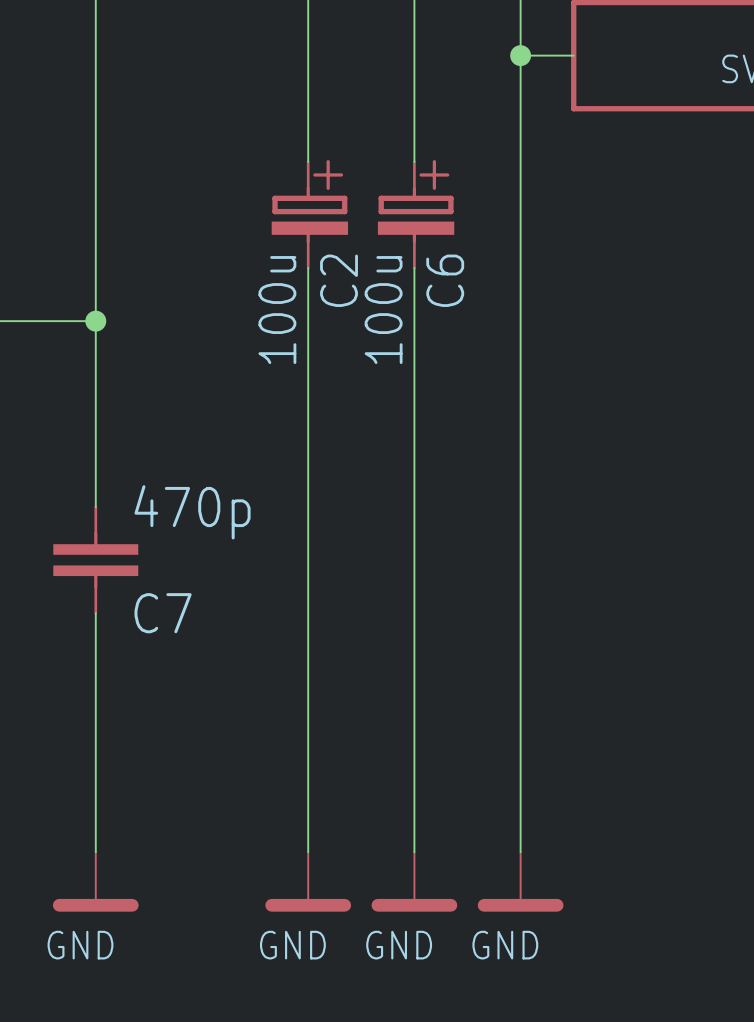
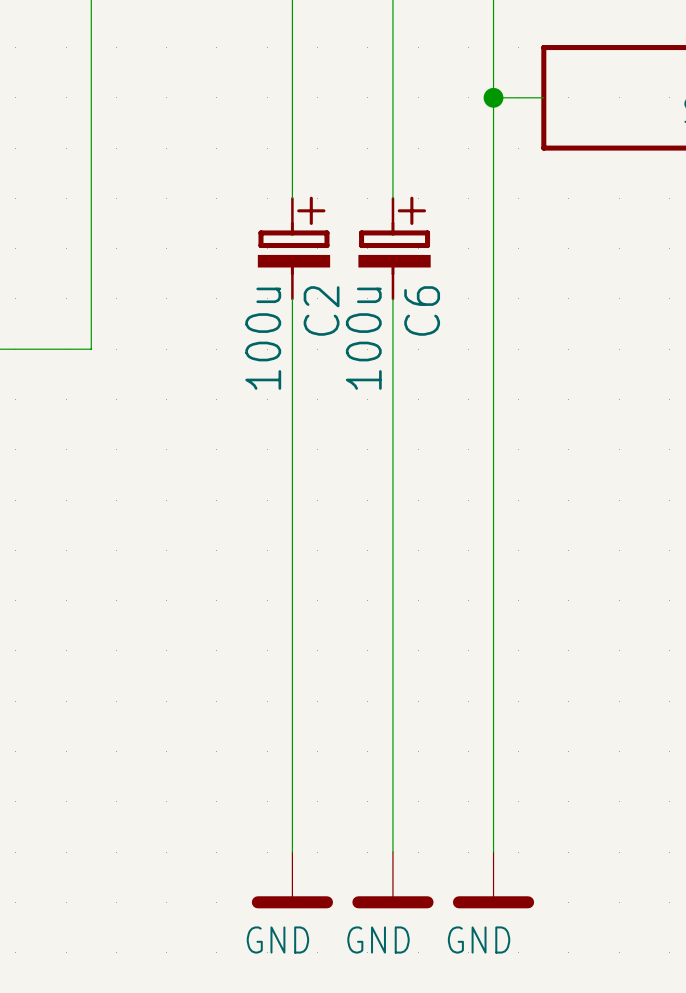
wire: (95, 321) (95, 507) -> none
junction: (95, 321) -> none
C7: 470p (95, 560) -> none
wire: (95, 613) (95, 852) -> none
power symbol: (95, 881) -> none

